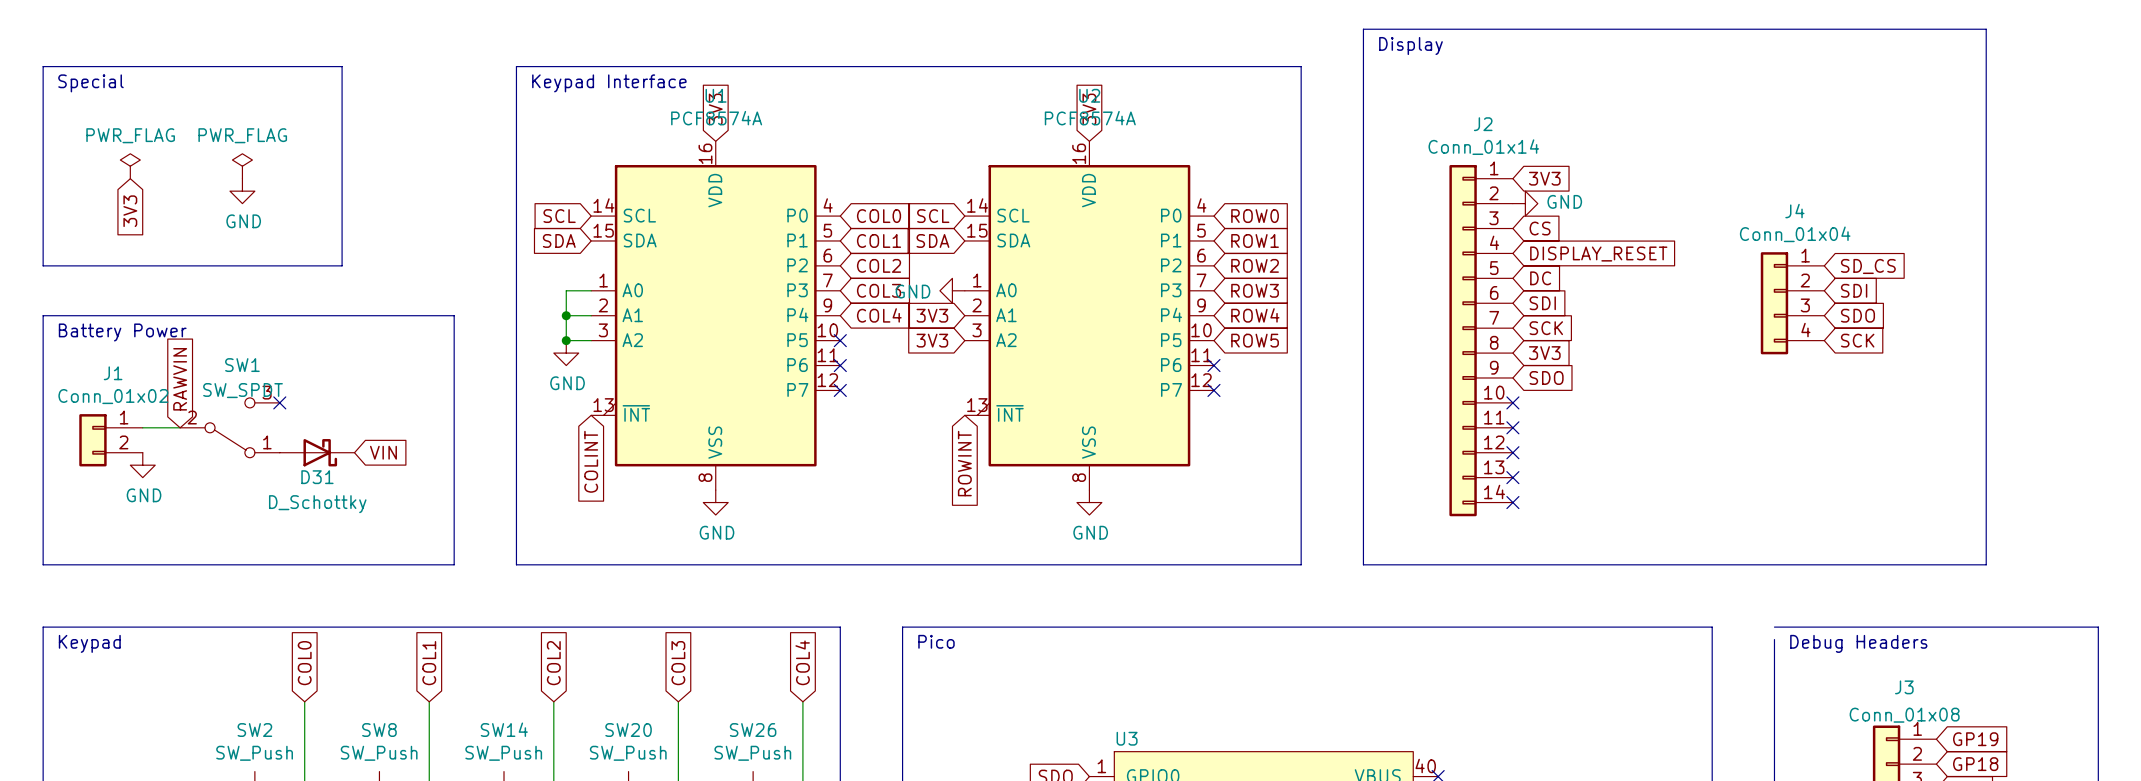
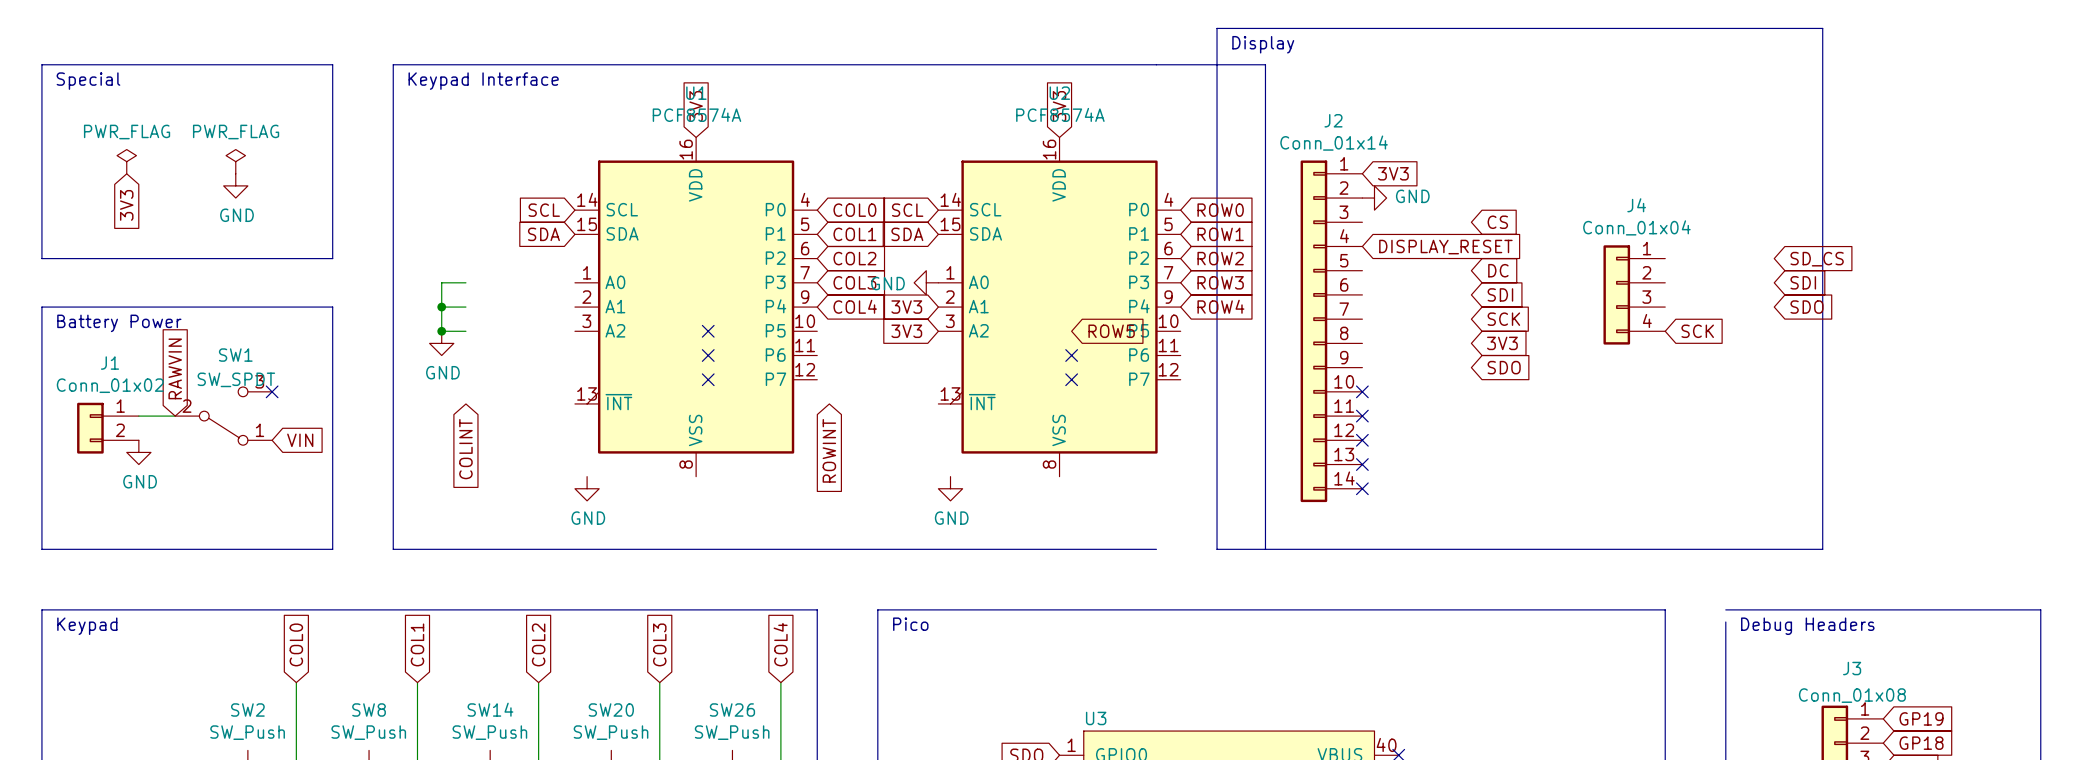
line: (1363, 29) (1363, 564) -> (1326, 28) (1217, 28) (1217, 549)
line: (1874, 29) (1986, 29) (1986, 564) (1874, 564) -> (1822, 28) (1822, 549)
text position: Display (1410, 46) -> Display (1263, 44)
line: (516, 66) (516, 564) -> (502, 64) (393, 64) (393, 549)
text position: Keypad Interface (609, 83) -> Keypad Interface (483, 81)
global label position: 3V3 (1544, 178) -> 3V3 (1393, 173)
power symbol position: GND (1525, 203) -> GND (1374, 198)
global label position: DISPLAY_RESET (1598, 254) -> DISPLAY_RESET (1445, 247)
wire: (591, 290) (566, 290) (566, 340) (591, 340) -> (465, 282) (441, 282) (441, 331) (465, 331)
J4 position: (1792, 303) -> (1634, 294)
line: (342, 315) (454, 315) (454, 564) -> (332, 307) (332, 549)
junction: none -> (441, 307)
wire: (566, 315) (591, 315) -> (441, 307) (465, 307)
junction: (566, 315) -> none
junction: none -> (441, 331)
junction: (566, 340) -> none
no-connect mark: none -> (708, 331)
no-connect mark: (840, 340) -> none
global label position: ROW5 (1255, 340) -> ROW5 (1111, 331)
J2 position: (1481, 340) -> (1331, 331)
global label position: SCK (1857, 340) -> SCK (1697, 331)
power symbol: none -> GND (441, 343)
power symbol: GND (566, 353) -> none
no-connect mark: none -> (708, 355)
no-connect mark: (840, 365) -> none
no-connect mark: none -> (1071, 355)
no-connect mark: (1213, 365) -> none
no-connect mark: none -> (708, 379)
no-connect mark: (840, 390) -> none
no-connect mark: none -> (1071, 379)
no-connect mark: (1213, 390) -> none
no-connect mark: none -> (1362, 391)
no-connect mark: (1512, 402) -> none
no-connect mark: none -> (1362, 416)
no-connect mark: (1512, 427) -> none
D31: D_Schottky (317, 452) -> none
global label position: VIN (383, 452) -> VIN (300, 440)
no-connect mark: none -> (1362, 440)
no-connect mark: (1512, 452) -> none
global label position: COLINT (591, 461) -> COLINT (465, 449)
global label position: ROWINT (964, 463) -> ROWINT (829, 450)
no-connect mark: none -> (1362, 464)
no-connect mark: (1512, 477) -> none
power symbol: none -> GND (587, 488)
power symbol: GND (715, 502) -> none
power symbol position: GND (1089, 502) -> GND (950, 488)
no-connect mark: none -> (1362, 488)
no-connect mark: (1512, 502) -> none
line: (342, 564) (404, 564) -> (441, 549) (502, 549)
line: (1189, 564) (1251, 564) -> (1265, 549) (1326, 549)

